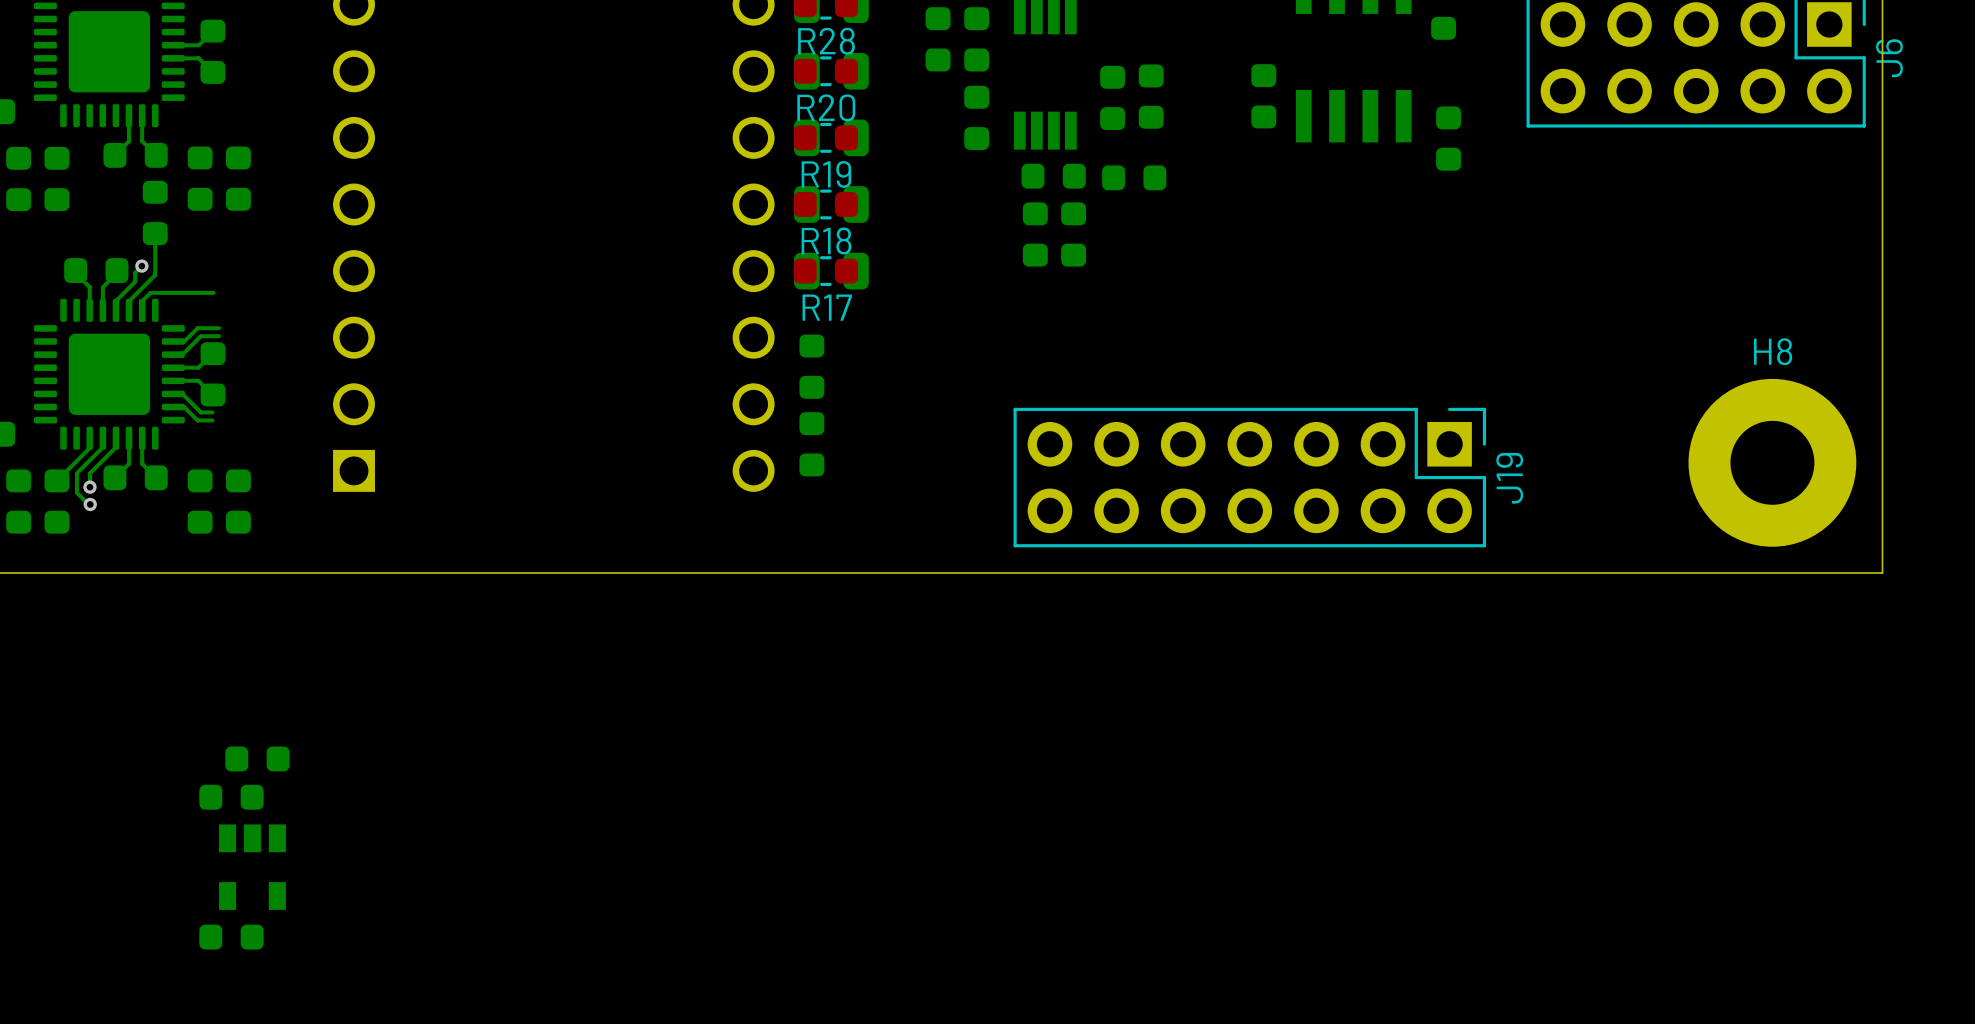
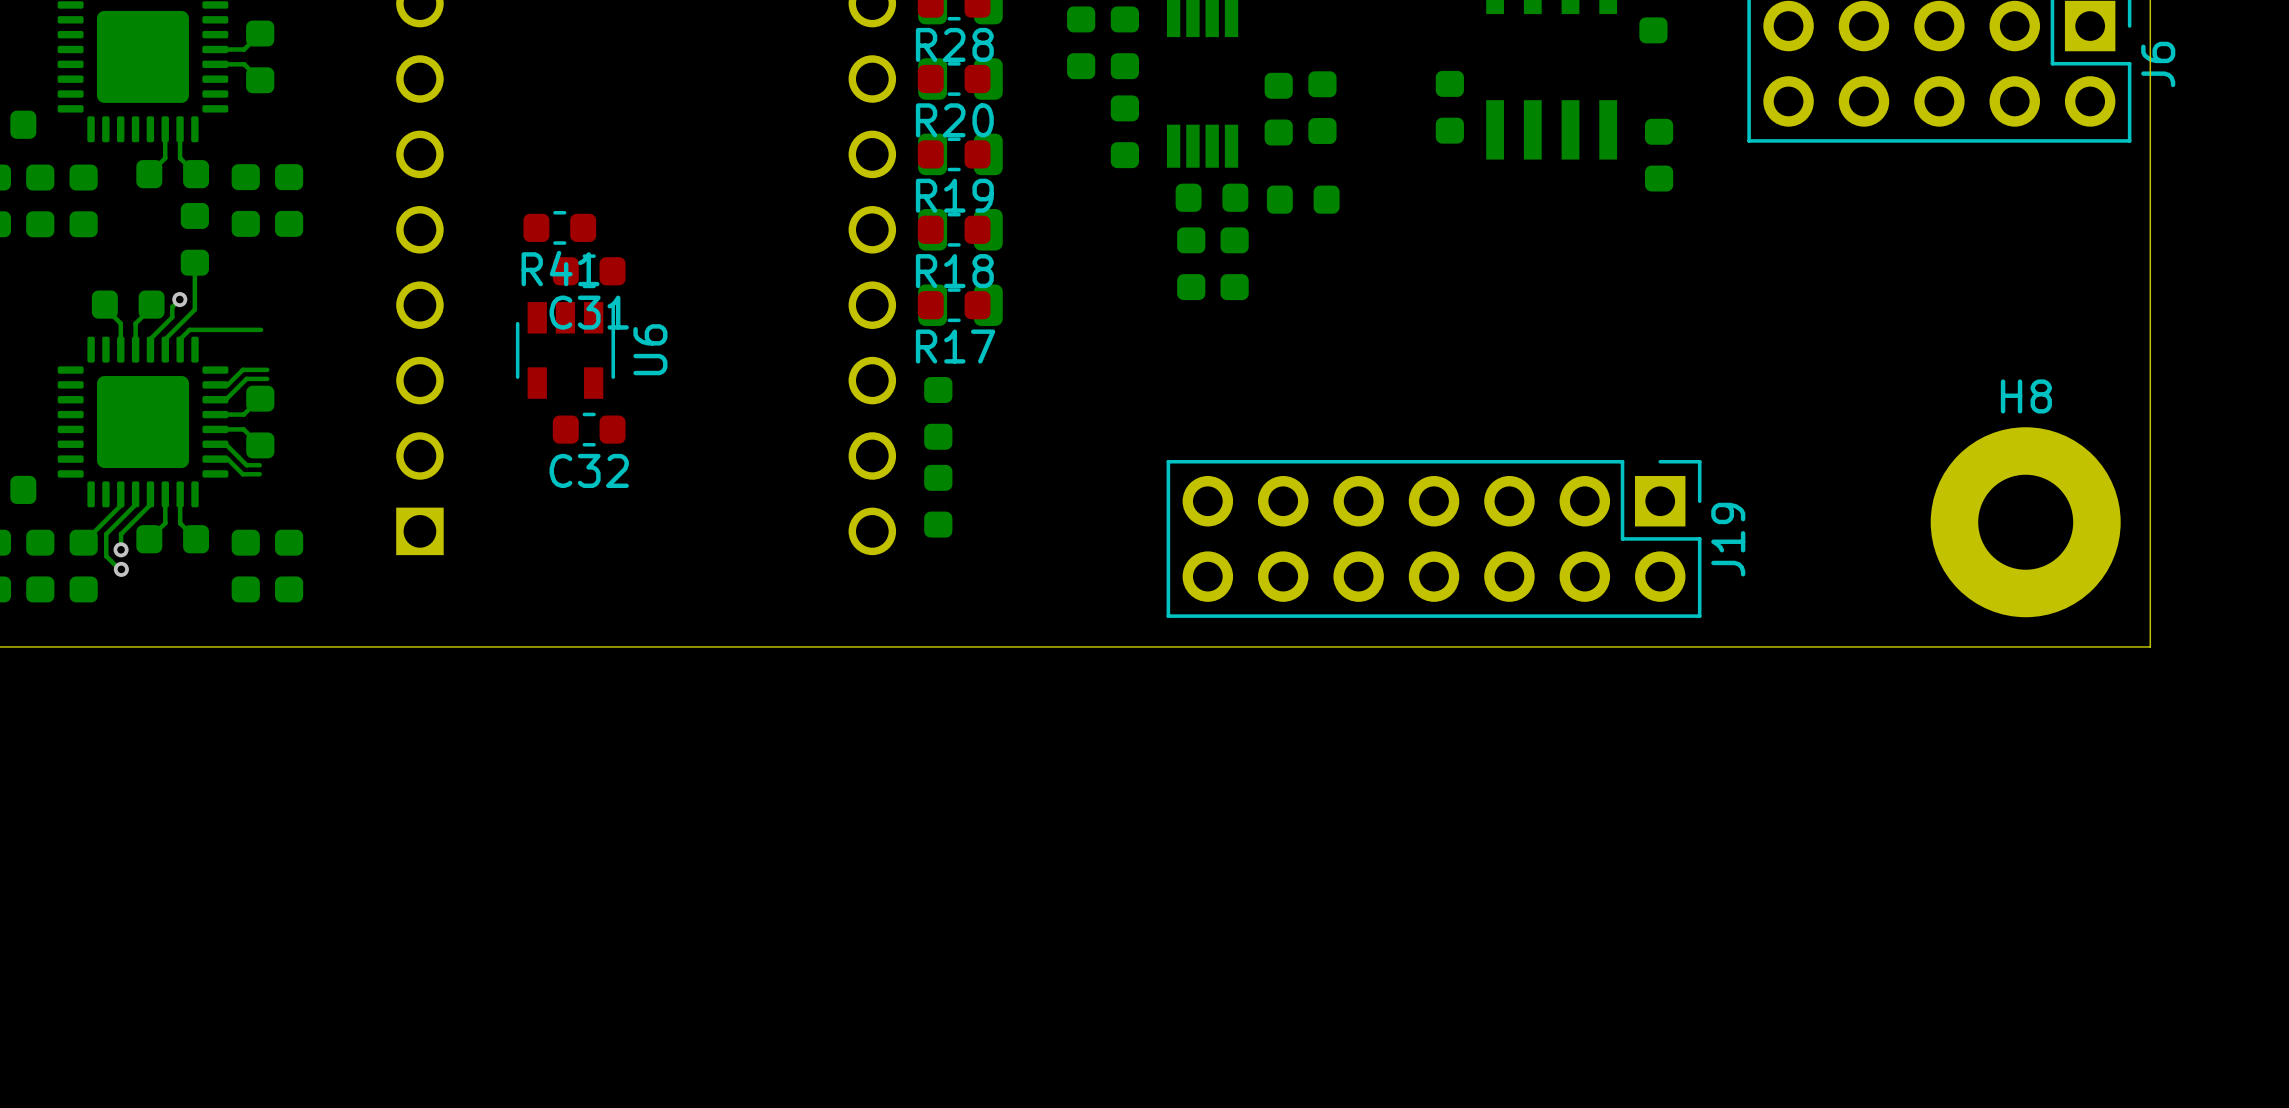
R41 side: bottom (257, 758) -> top (559, 227)
C31 side: bottom (231, 797) -> top (589, 271)
U6 side: bottom (252, 867) -> top (565, 350)
C32 side: bottom (231, 937) -> top (589, 429)

